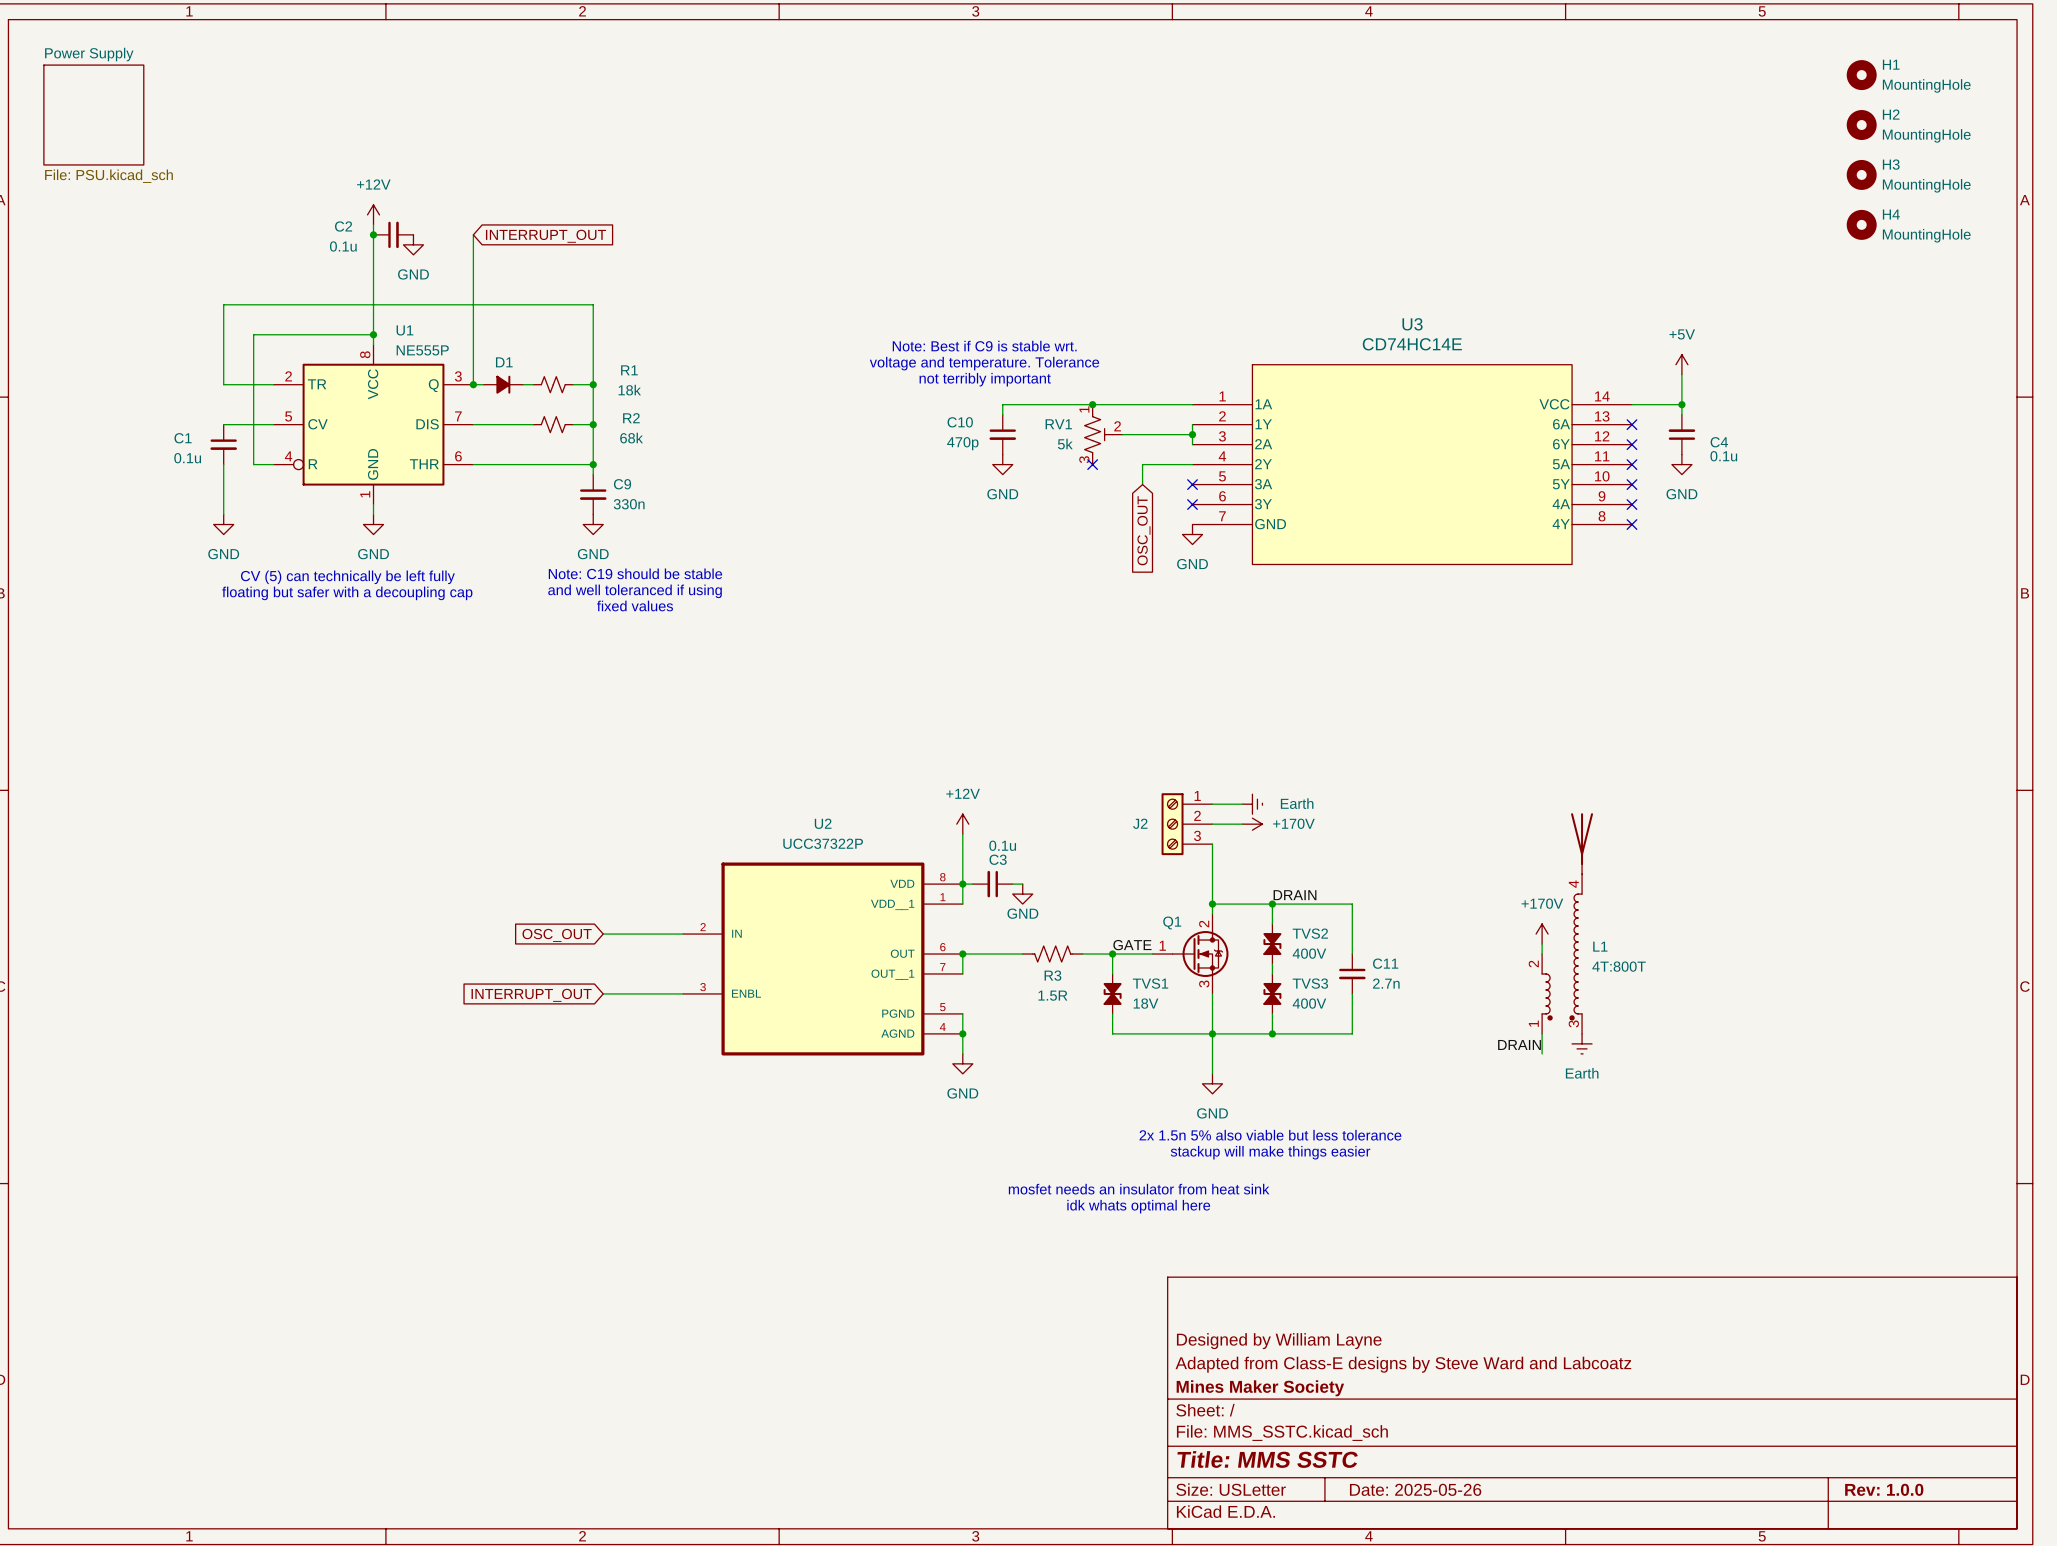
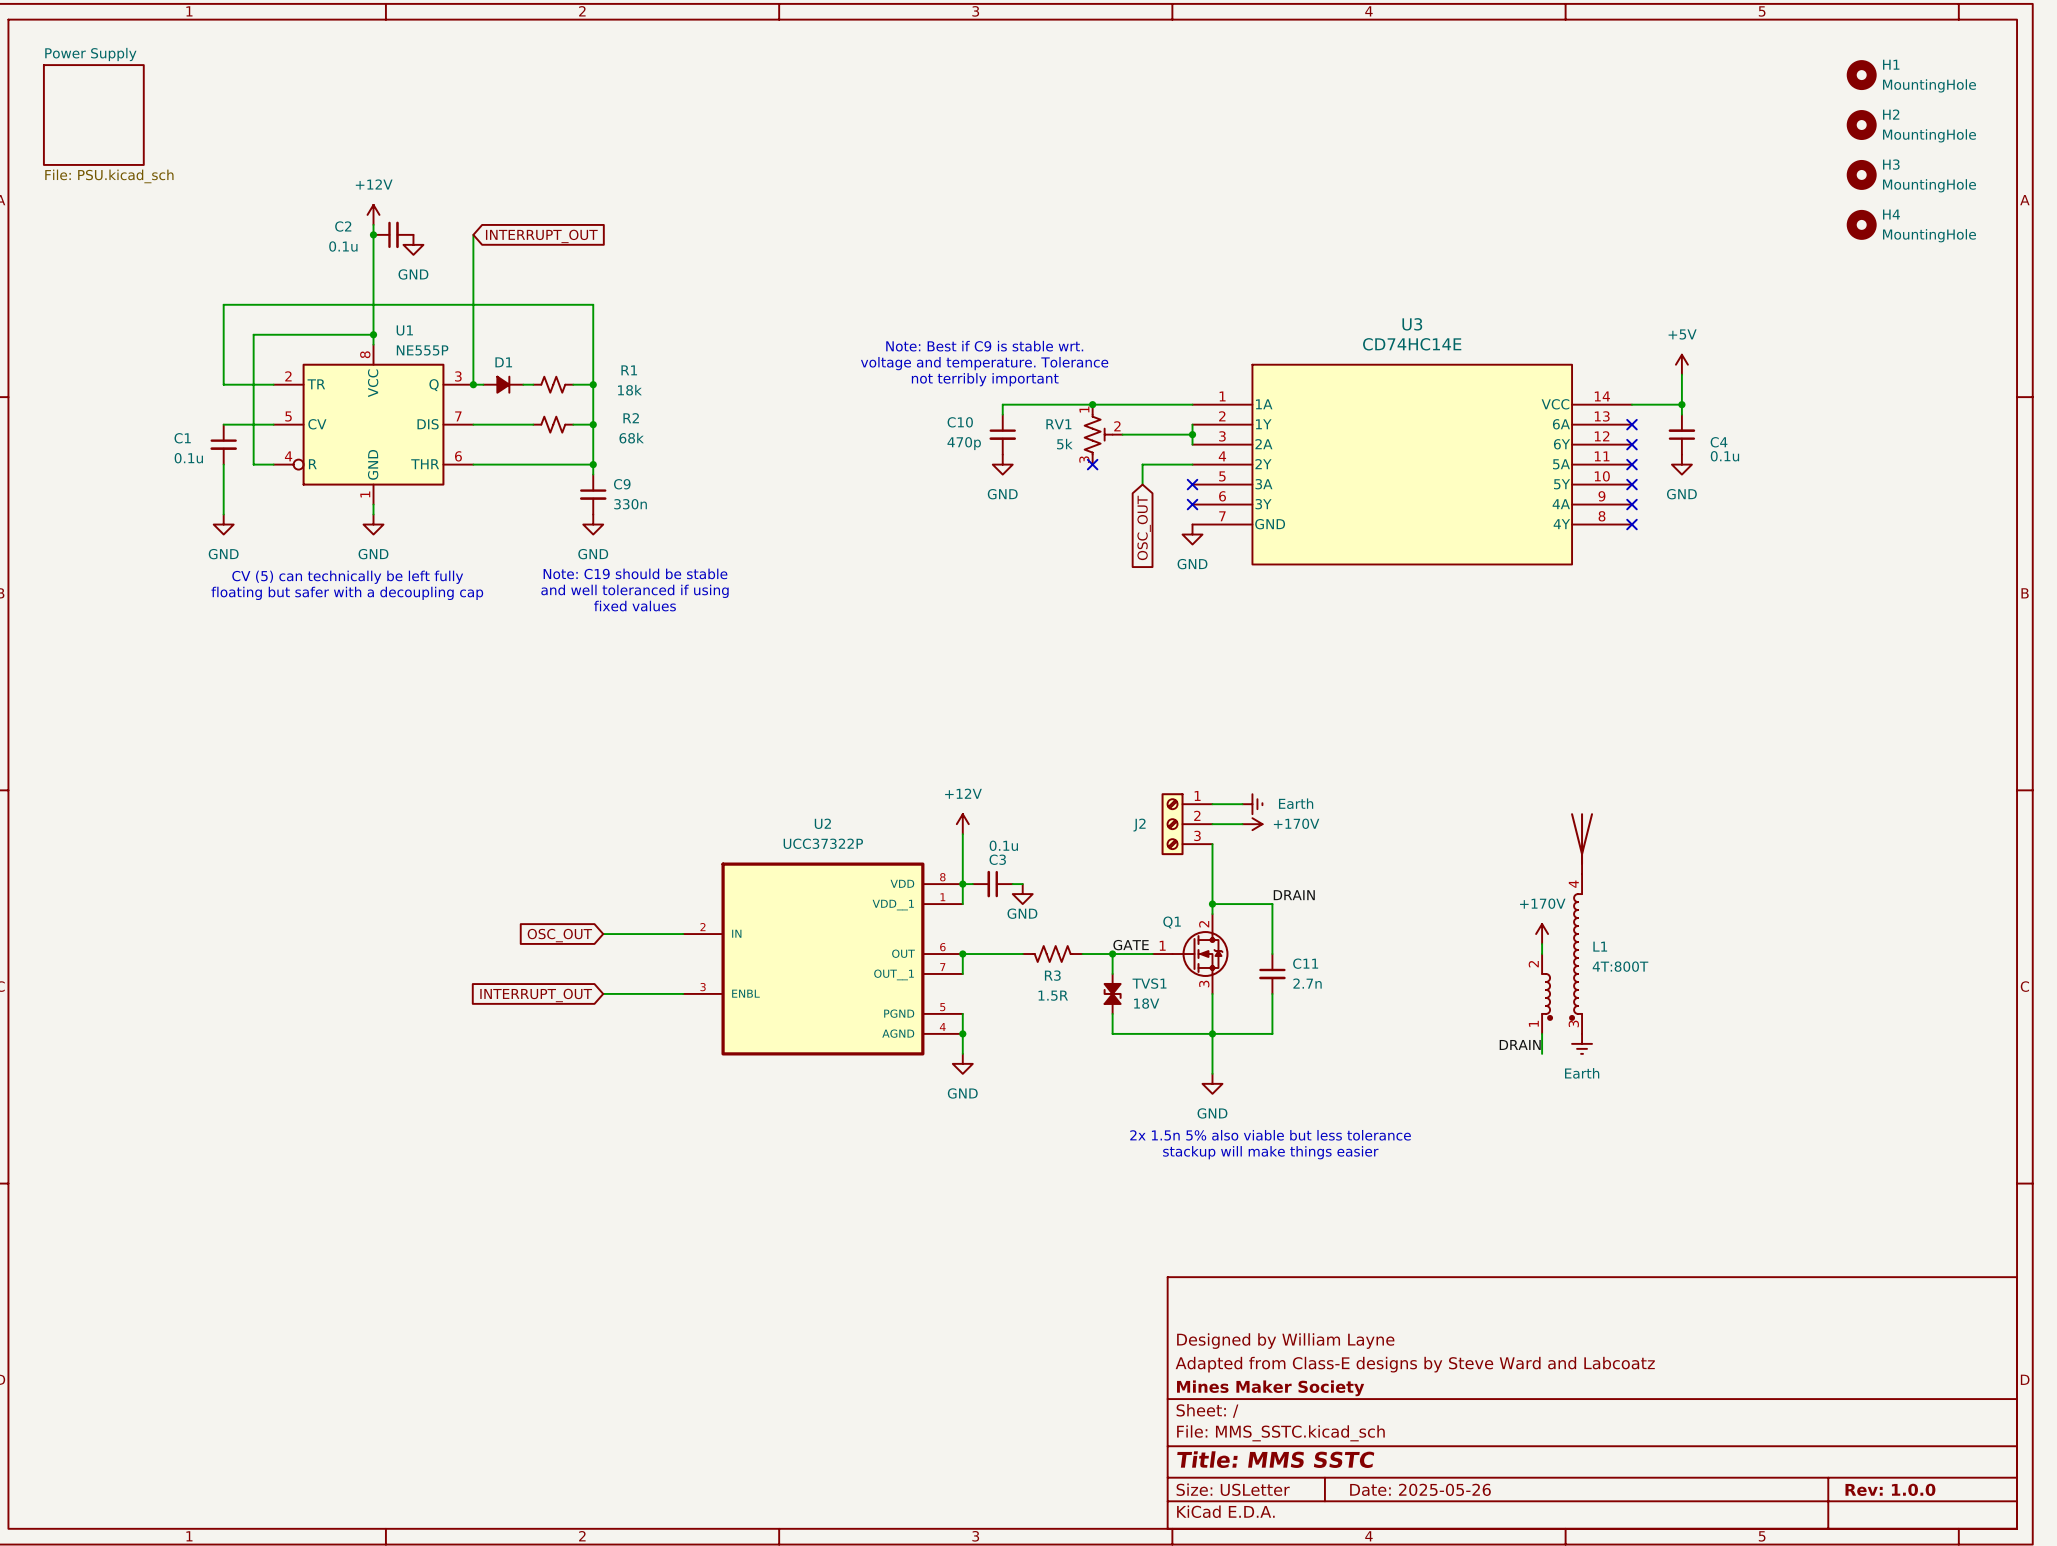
wire: (1272, 904) (1352, 904) (1352, 954) -> none
junction: (1272, 904) -> none
TVS2: 400V (1272, 944) -> none
C11 position: (1352, 973) -> (1272, 973)
TVS3: 400V (1272, 993) -> none
wire: (1352, 993) (1352, 1033) (1272, 1033) -> none
junction: (1272, 1033) -> none
text: mosfet needs an insulator from heat sink (1139, 1189) -> none
text: idk whats optimal here (1138, 1206) -> none

